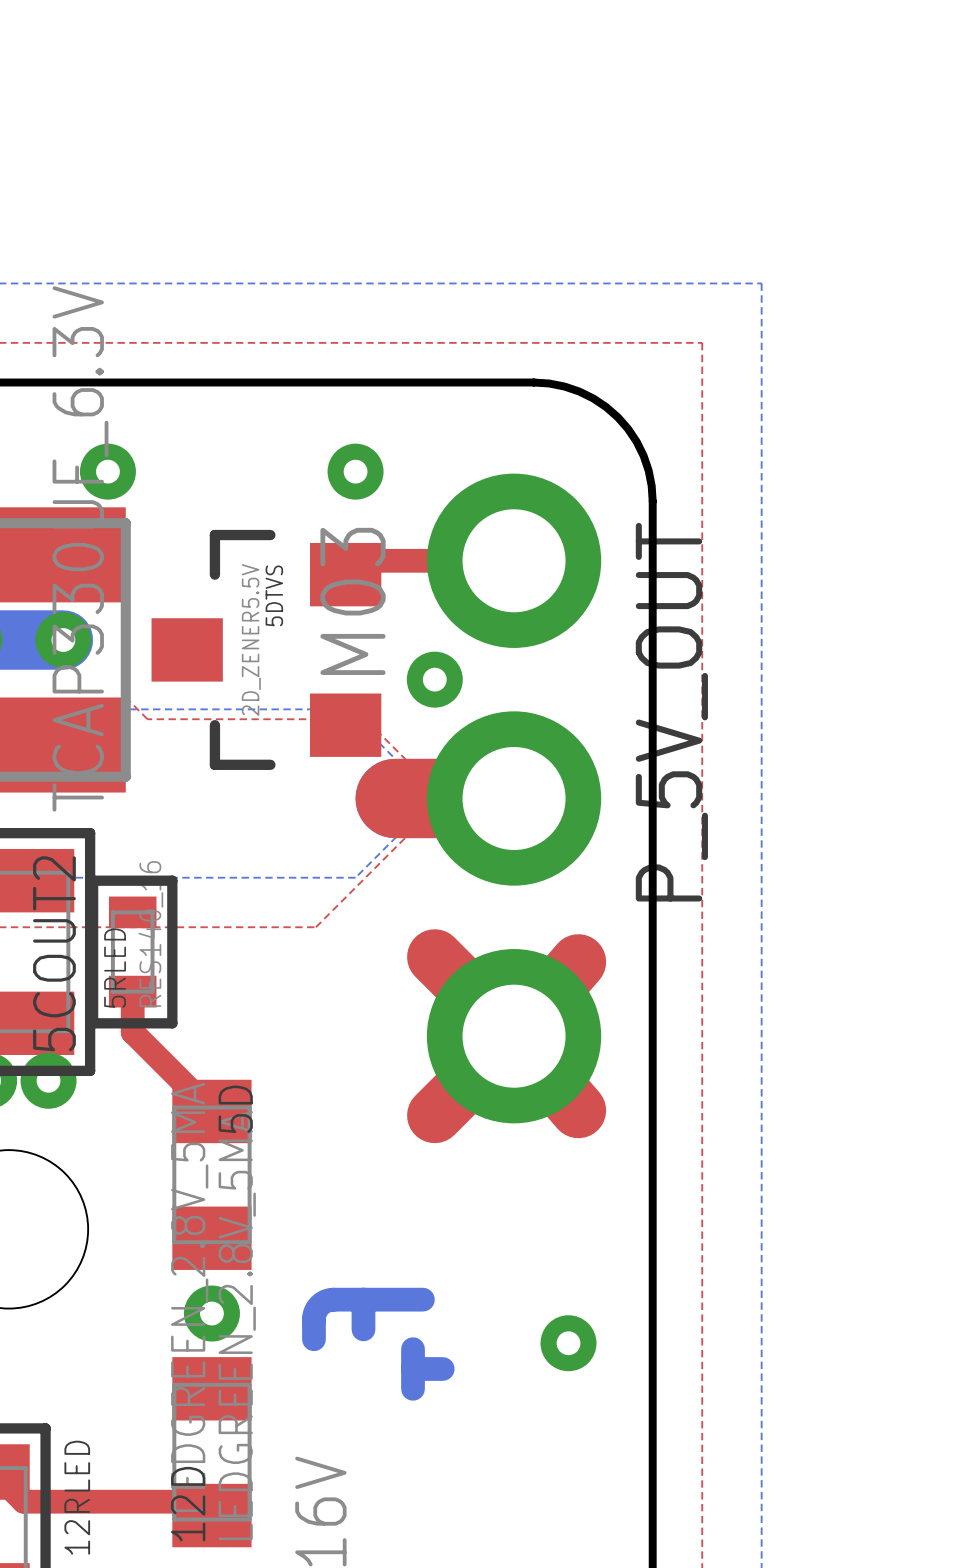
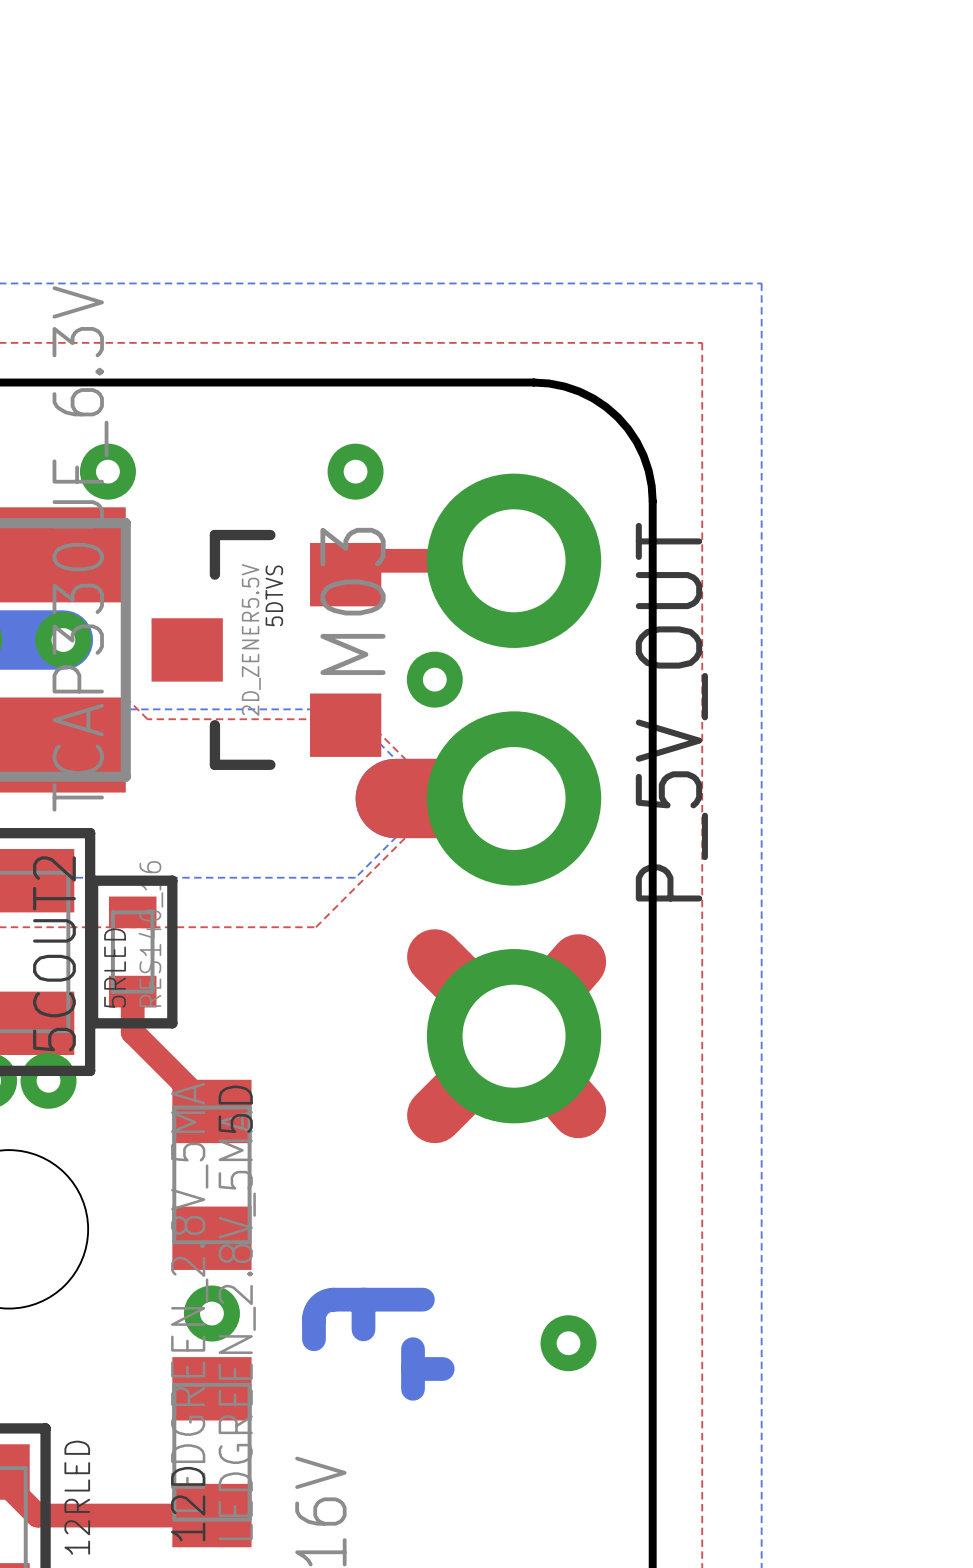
top track: (23, 1501) (198, 1501) (211, 1515) -> (23, 1501) (37, 1515) (211, 1515)

